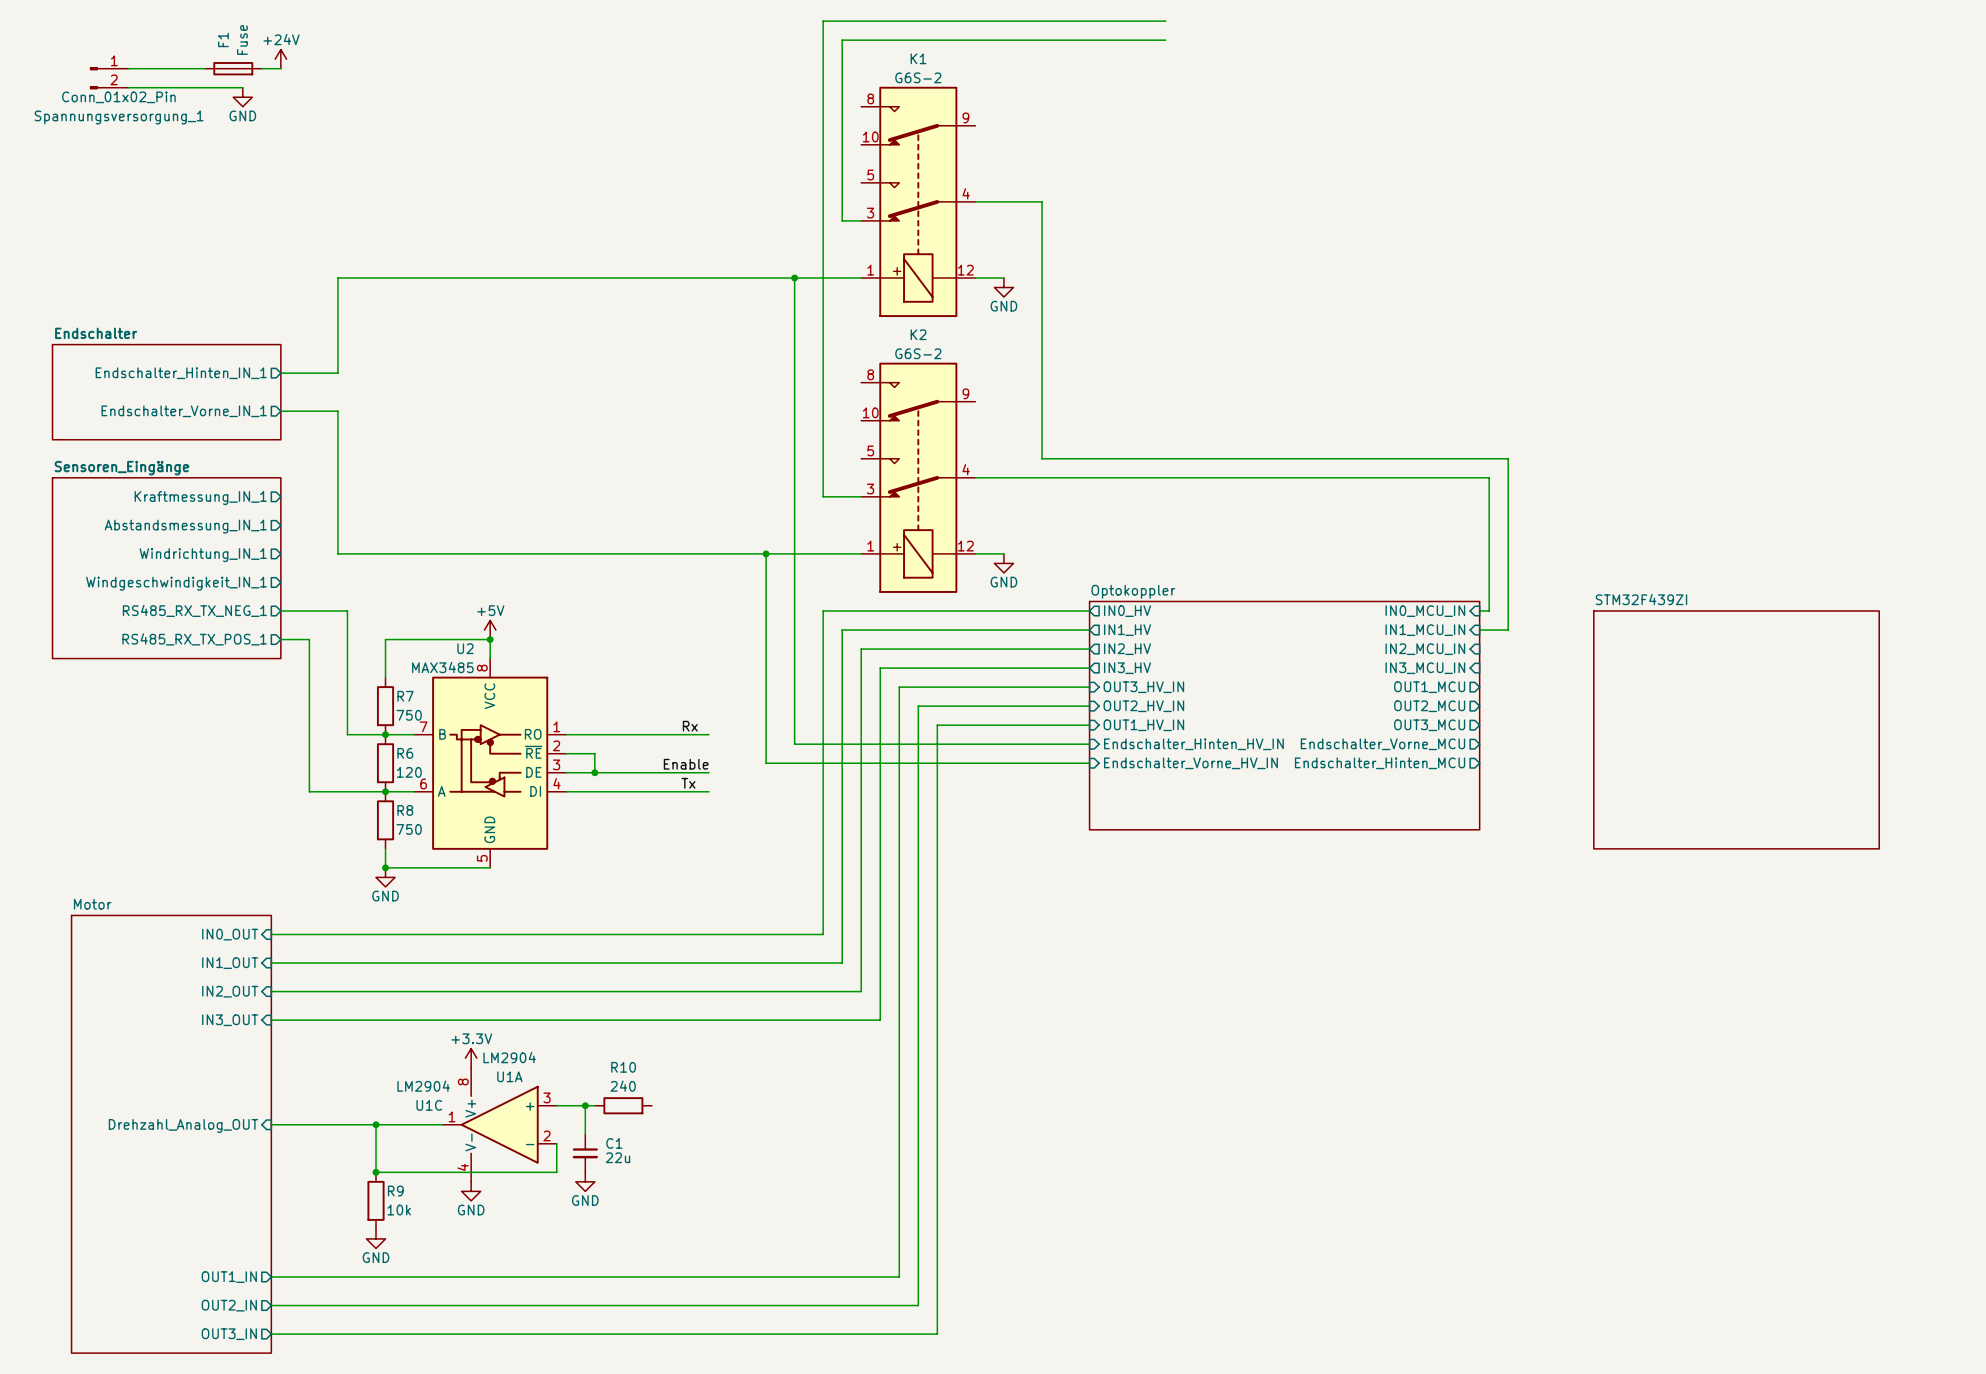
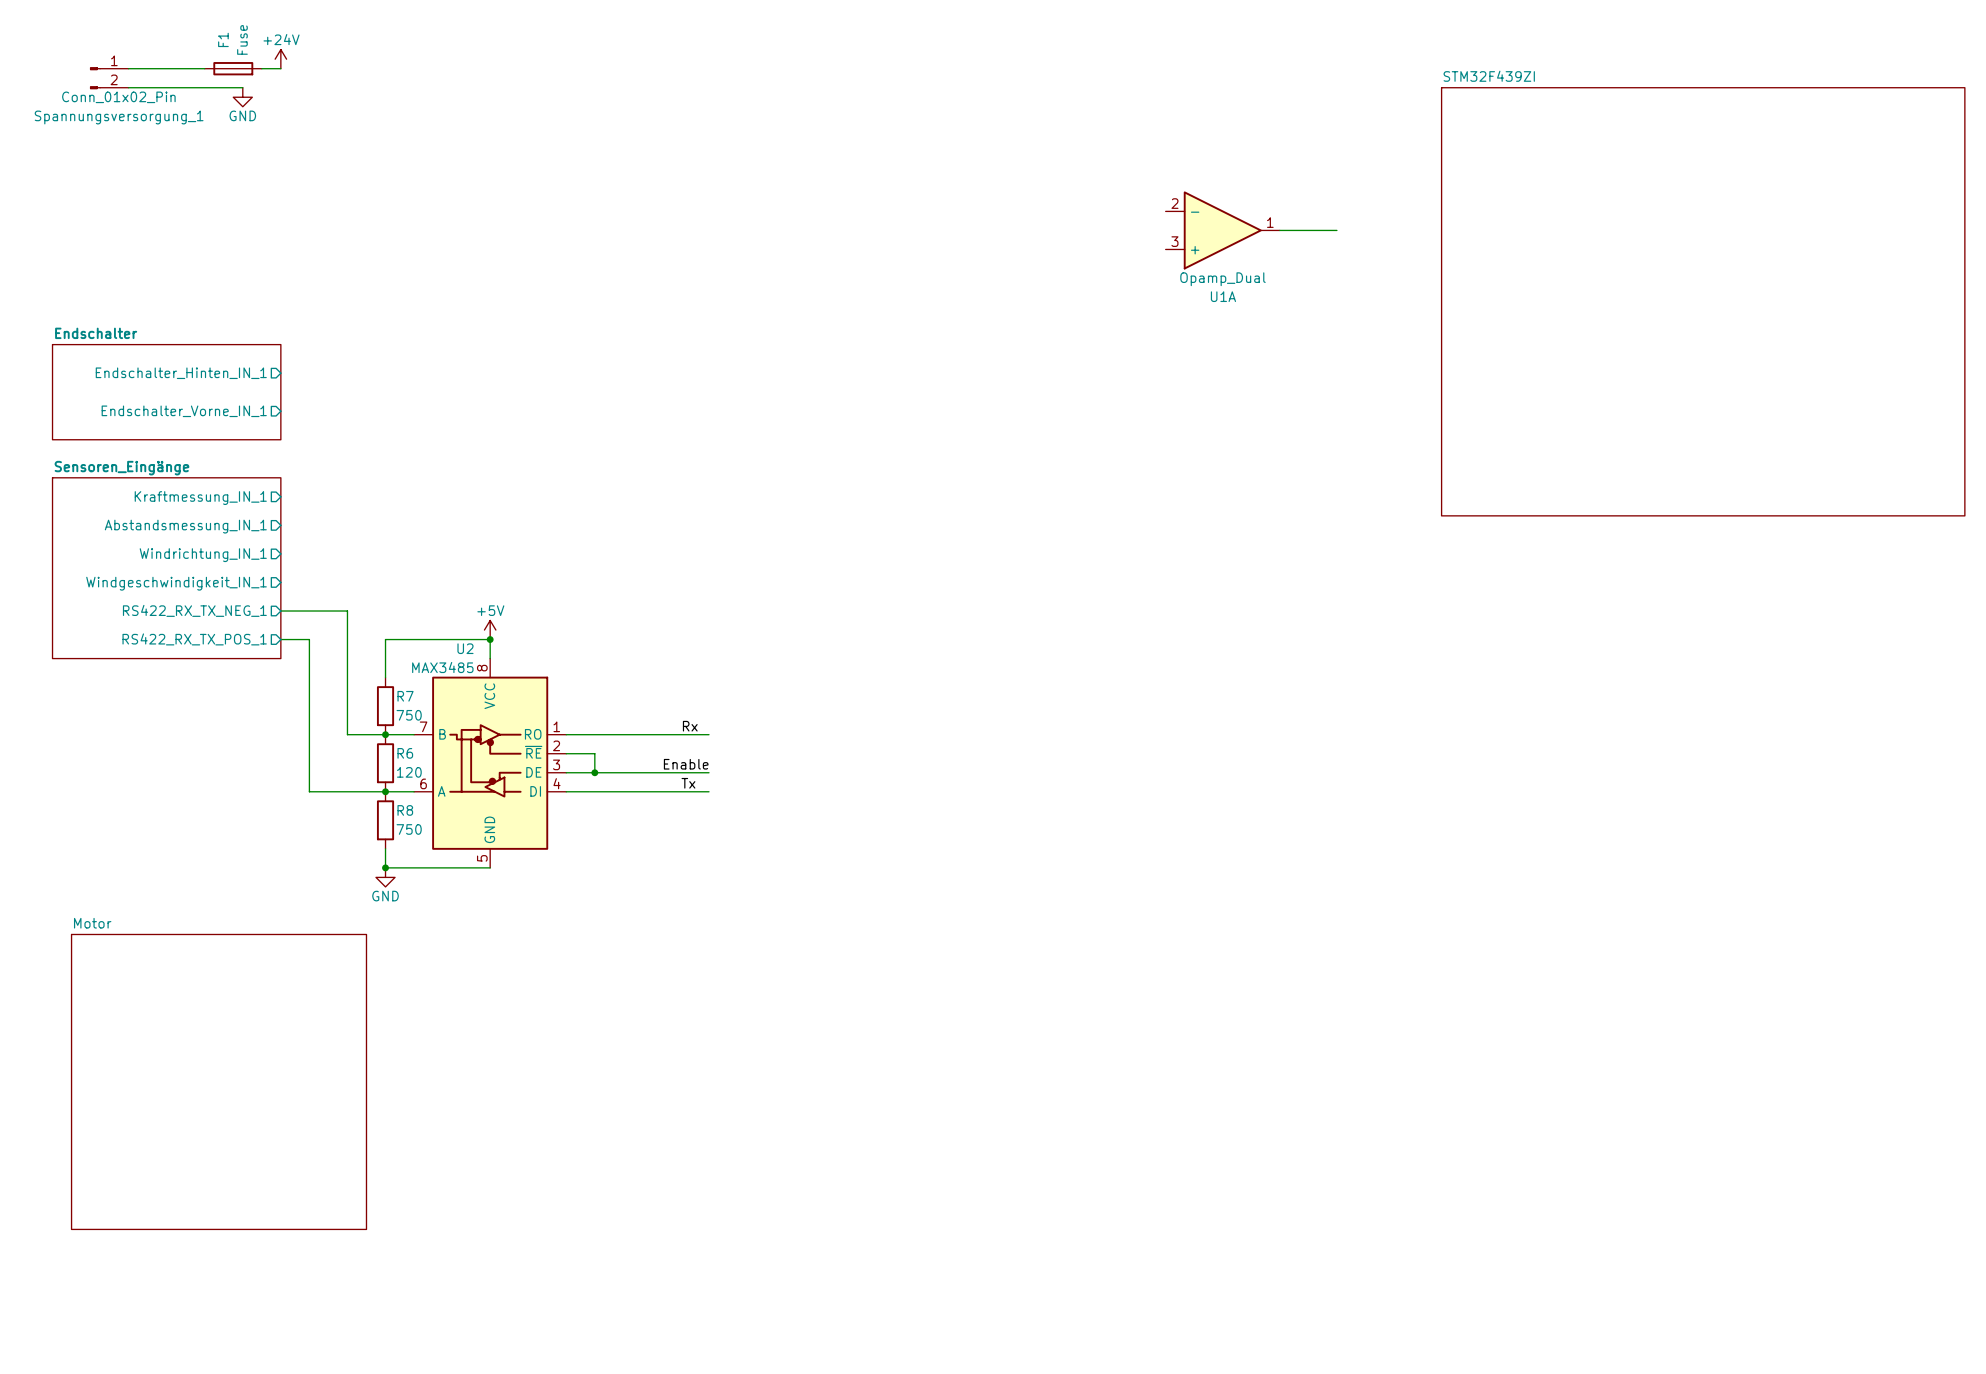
wire: (1165, 21) (823, 21) (823, 496) (861, 496) -> none
wire: (1165, 40) (842, 40) (842, 220) (861, 220) -> none
K1: G6S-2 (918, 201) -> none
wire: (975, 201) (1041, 201) (1041, 458) (1508, 458) (1508, 630) (1479, 630) -> none
wire: none -> (1279, 230) (1336, 230)
wire: (794, 278) (794, 744) (1089, 744) -> none
junction: (794, 278) -> none
wire: (861, 278) (337, 278) (337, 373) (280, 373) -> none
wire: (975, 278) (1003, 278) -> none
power symbol: GND (1003, 287) -> none
wire: (280, 411) (337, 411) (337, 553) (861, 553) -> none
K2: G6S-2 (918, 477) -> none
wire: (975, 477) (1489, 477) (1489, 611) (1479, 611) -> none
wire: (766, 553) (766, 763) (1089, 763) -> none
junction: (766, 553) -> none
wire: (975, 553) (1003, 553) -> none
power symbol: GND (1003, 563) -> none
sheet STM32F439ZI name position: STM32F439ZI (1641, 599) -> STM32F439ZI (1489, 76)
sheet pin: RS485_RX_TX_NEG_1 (194, 610) -> RS422_RX_TX_NEG_1 (194, 610)
sheet STM32F439ZI shape: [1593, 610, 1880, 850] -> [1441, 87, 1966, 517]
wire: (1089, 611) (823, 611) (823, 934) (271, 934) -> none
sheet pin: IN0_HV (1127, 611) -> none
sheet pin: IN0_MCU_IN (1425, 611) -> none
wire: (1089, 630) (842, 630) (842, 963) (271, 963) -> none
sheet pin: IN1_HV (1127, 630) -> none
sheet pin: IN1_MCU_IN (1425, 630) -> none
sheet pin: RS485_RX_TX_POS_1 (194, 639) -> RS422_RX_TX_POS_1 (194, 639)
wire: (1089, 649) (861, 649) (861, 991) (271, 991) -> none
sheet pin: IN2_HV (1127, 649) -> none
sheet pin: IN2_MCU_IN (1425, 649) -> none
wire: (1089, 668) (880, 668) (880, 1020) (271, 1020) -> none
sheet pin: IN3_HV (1127, 668) -> none
sheet pin: IN3_MCU_IN (1425, 668) -> none
wire: (1089, 687) (899, 687) (899, 1276) (271, 1276) -> none
sheet pin: OUT3_HV_IN (1143, 687) -> none
sheet pin: OUT1_MCU (1429, 687) -> none
wire: (1089, 706) (918, 706) (918, 1305) (271, 1305) -> none
sheet pin: OUT2_HV_IN (1143, 706) -> none
sheet pin: OUT2_MCU (1429, 706) -> none
sheet Optokoppler: (1284, 715) -> none
wire: (1089, 725) (937, 725) (937, 1334) (271, 1334) -> none
sheet pin: OUT1_HV_IN (1143, 725) -> none
sheet pin: OUT3_MCU (1429, 725) -> none
sheet pin: Endschalter_Hinten_HV_IN (1193, 744) -> none
sheet pin: Endschalter_Vorne_MCU (1383, 744) -> none
sheet pin: Endschalter_Vorne_HV_IN (1190, 763) -> none
sheet pin: Endschalter_Hinten_MCU (1380, 763) -> none
sheet pin: IN0_OUT (230, 934) -> none
sheet pin: IN1_OUT (230, 963) -> none
sheet pin: IN2_OUT (230, 991) -> none
sheet pin: IN3_OUT (230, 1020) -> none
U1A value: LM2904 (509, 1057) -> Opamp_Dual (1222, 279)
power symbol: +3.3V (471, 1058) -> none
U1A name position: U1A (509, 1076) -> U1A (1223, 296)
sheet Motor: none -> (219, 1081)
wire: (556, 1105) (594, 1105) -> none
wire: (585, 1105) (585, 1134) -> none
junction: (585, 1105) -> none
R10: 240 (623, 1105) -> none
wire: (271, 1124) (442, 1124) -> none
wire: (376, 1124) (376, 1172) (556, 1172) (556, 1143) -> none
junction: (376, 1124) -> none
U1C: LM2904 (471, 1124) -> none
U1A rotation: 0° (499, 1124) -> 180° (1222, 230)
U1A position: (499, 1124) -> (1222, 230)
sheet pin: Drehzahl_Analog_OUT (183, 1126) -> none
sheet Motor: (171, 1134) -> none
C1: 22u (585, 1153) -> none
junction: (376, 1172) -> none
power symbol: GND (585, 1181) -> none
power symbol: GND (471, 1191) -> none
R9: 10k (376, 1200) -> none
power symbol: GND (376, 1238) -> none
sheet pin: OUT1_IN (229, 1277) -> none
sheet pin: OUT2_IN (229, 1305) -> none
sheet pin: OUT3_IN (229, 1334) -> none

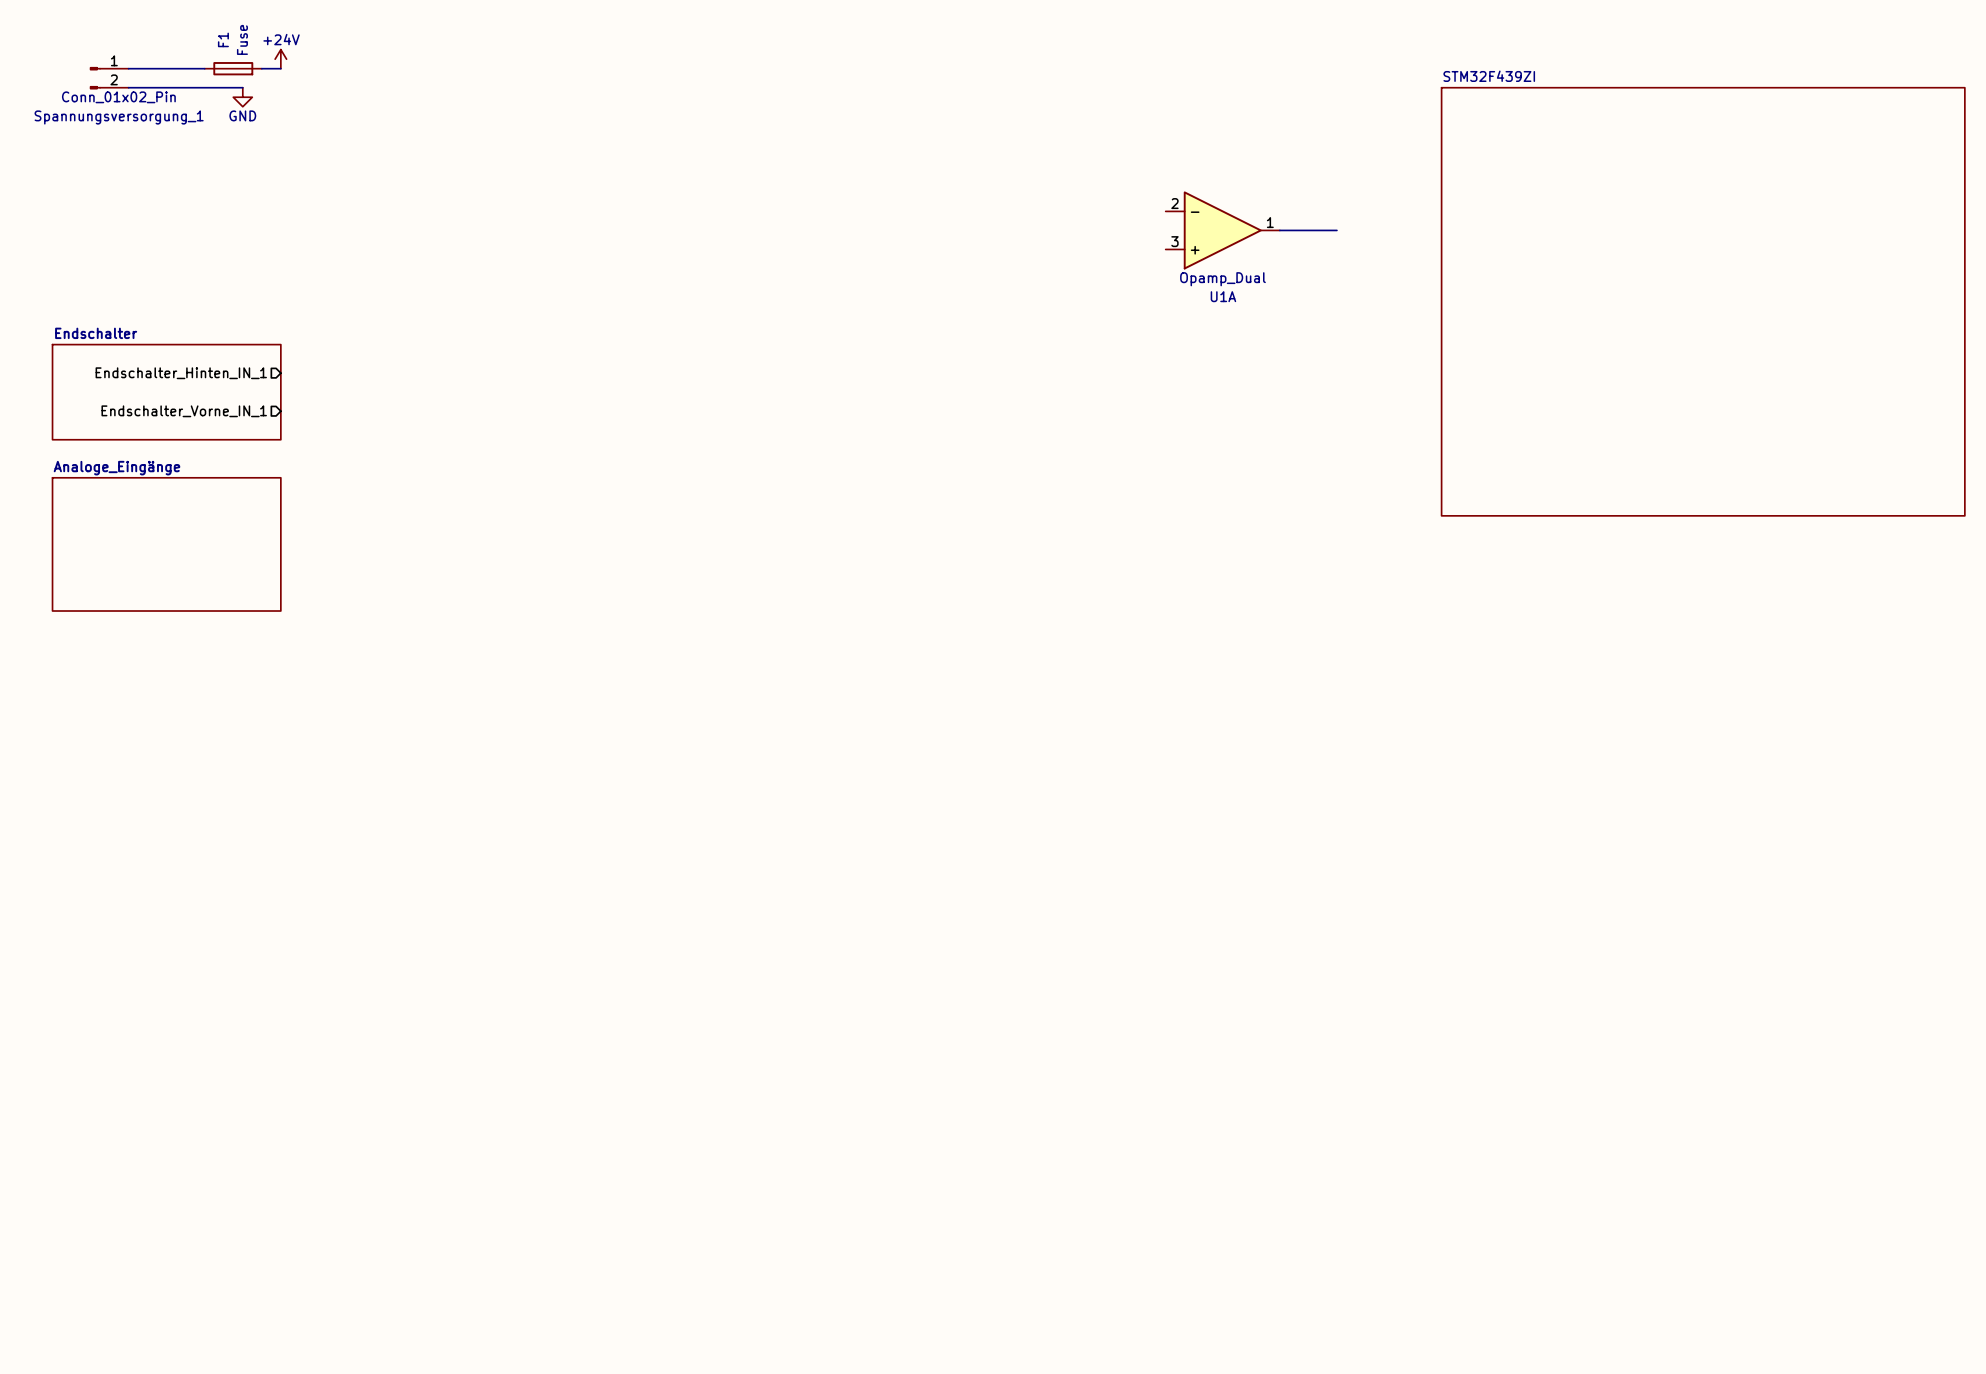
sheet pin: Kraftmessung_IN_1 (200, 498) -> none
sheet pin: Abstandsmessung_IN_1 (185, 526) -> none
sheet Analoge_Eingänge: none -> (166, 544)
sheet pin: Windrichtung_IN_1 (203, 555) -> none
sheet Sensoren_Eingänge: (166, 568) -> none
sheet pin: Windgeschwindigkeit_IN_1 (176, 583) -> none
sheet pin: RS422_RX_TX_NEG_1 (194, 610) -> none
wire: (280, 611) (347, 611) (347, 734) (414, 734) -> none
power symbol: +5V (490, 630) -> none
sheet pin: RS422_RX_TX_POS_1 (194, 639) -> none
wire: (280, 639) (309, 639) (309, 791) (414, 791) -> none
junction: (490, 639) -> none
wire: (490, 658) (490, 639) (385, 639) (385, 677) -> none
R7: 750 (385, 706) -> none
label: Rx (690, 726) -> none
junction: (385, 734) -> none
wire: (566, 734) (709, 734) -> none
wire: (566, 753) (594, 753) (594, 772) -> none
R6: 120 (385, 763) -> none
U2: MAX3485 (490, 763) -> none
label: Enable (686, 764) -> none
wire: (566, 772) (709, 772) -> none
junction: (594, 772) -> none
label: Tx (688, 783) -> none
junction: (385, 791) -> none
wire: (566, 791) (709, 791) -> none
R8: 750 (385, 820) -> none
wire: (385, 848) (385, 867) (490, 867) -> none
junction: (385, 867) -> none
power symbol: GND (385, 877) -> none
sheet Motor: (219, 1081) -> none

